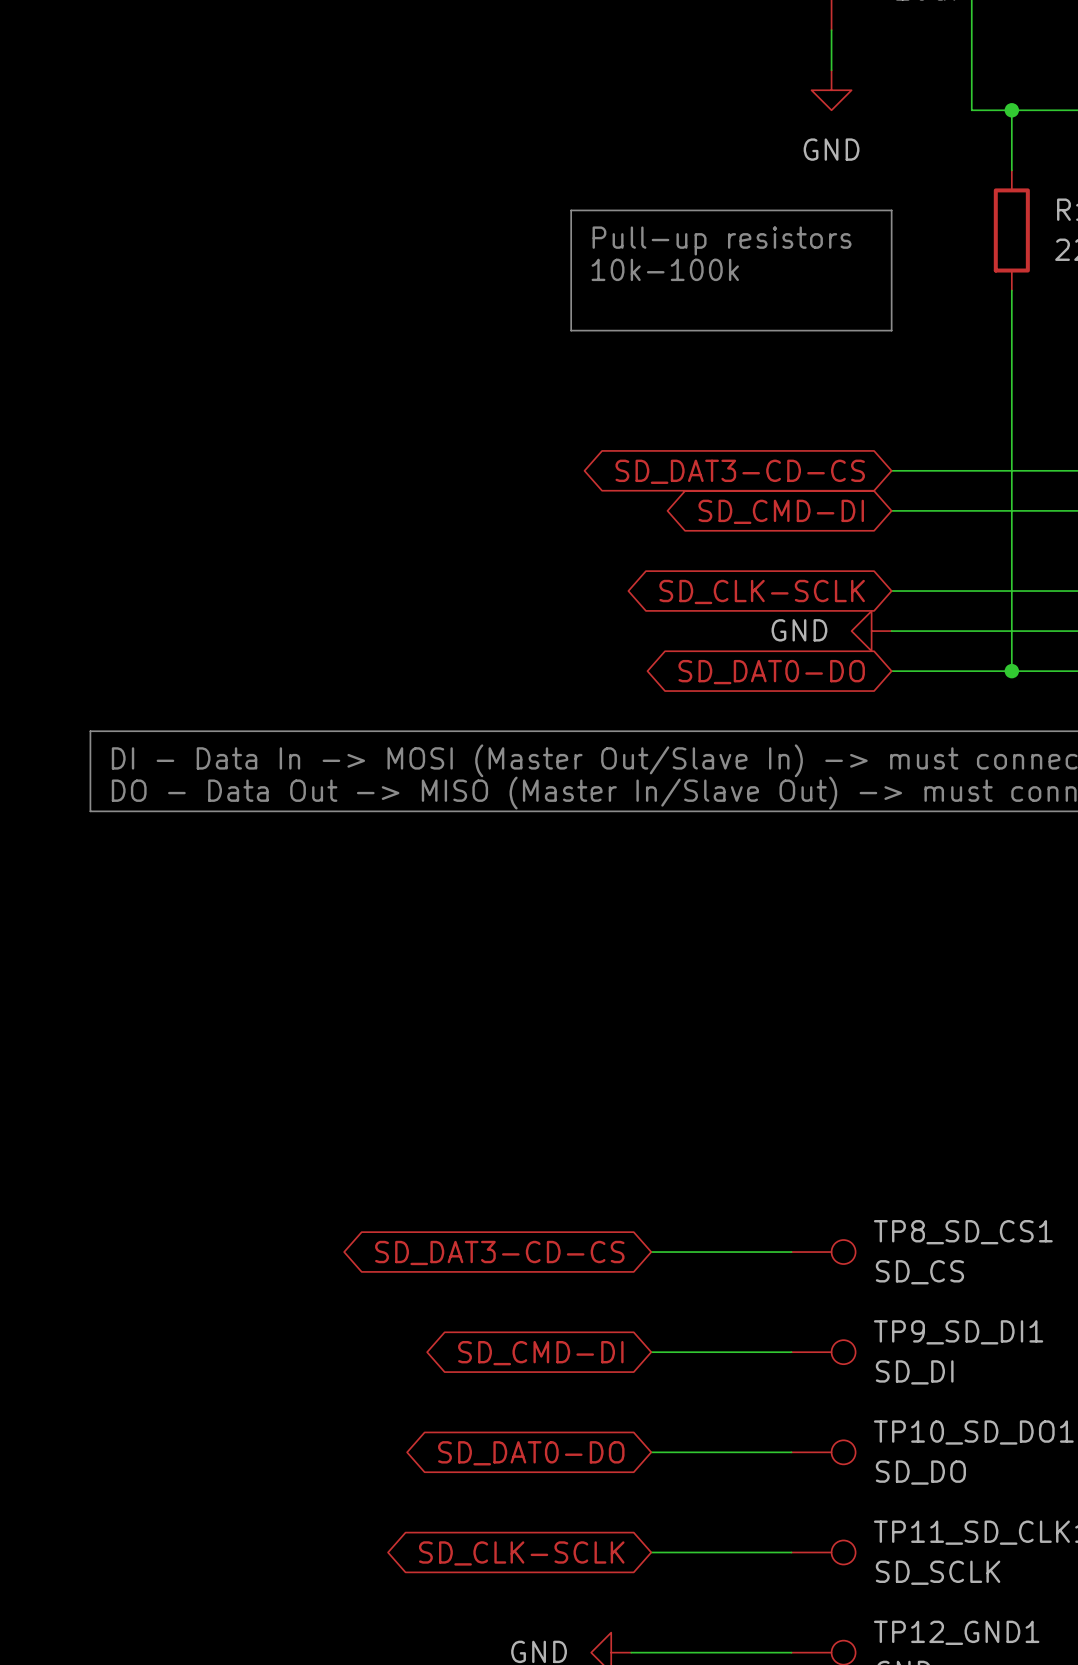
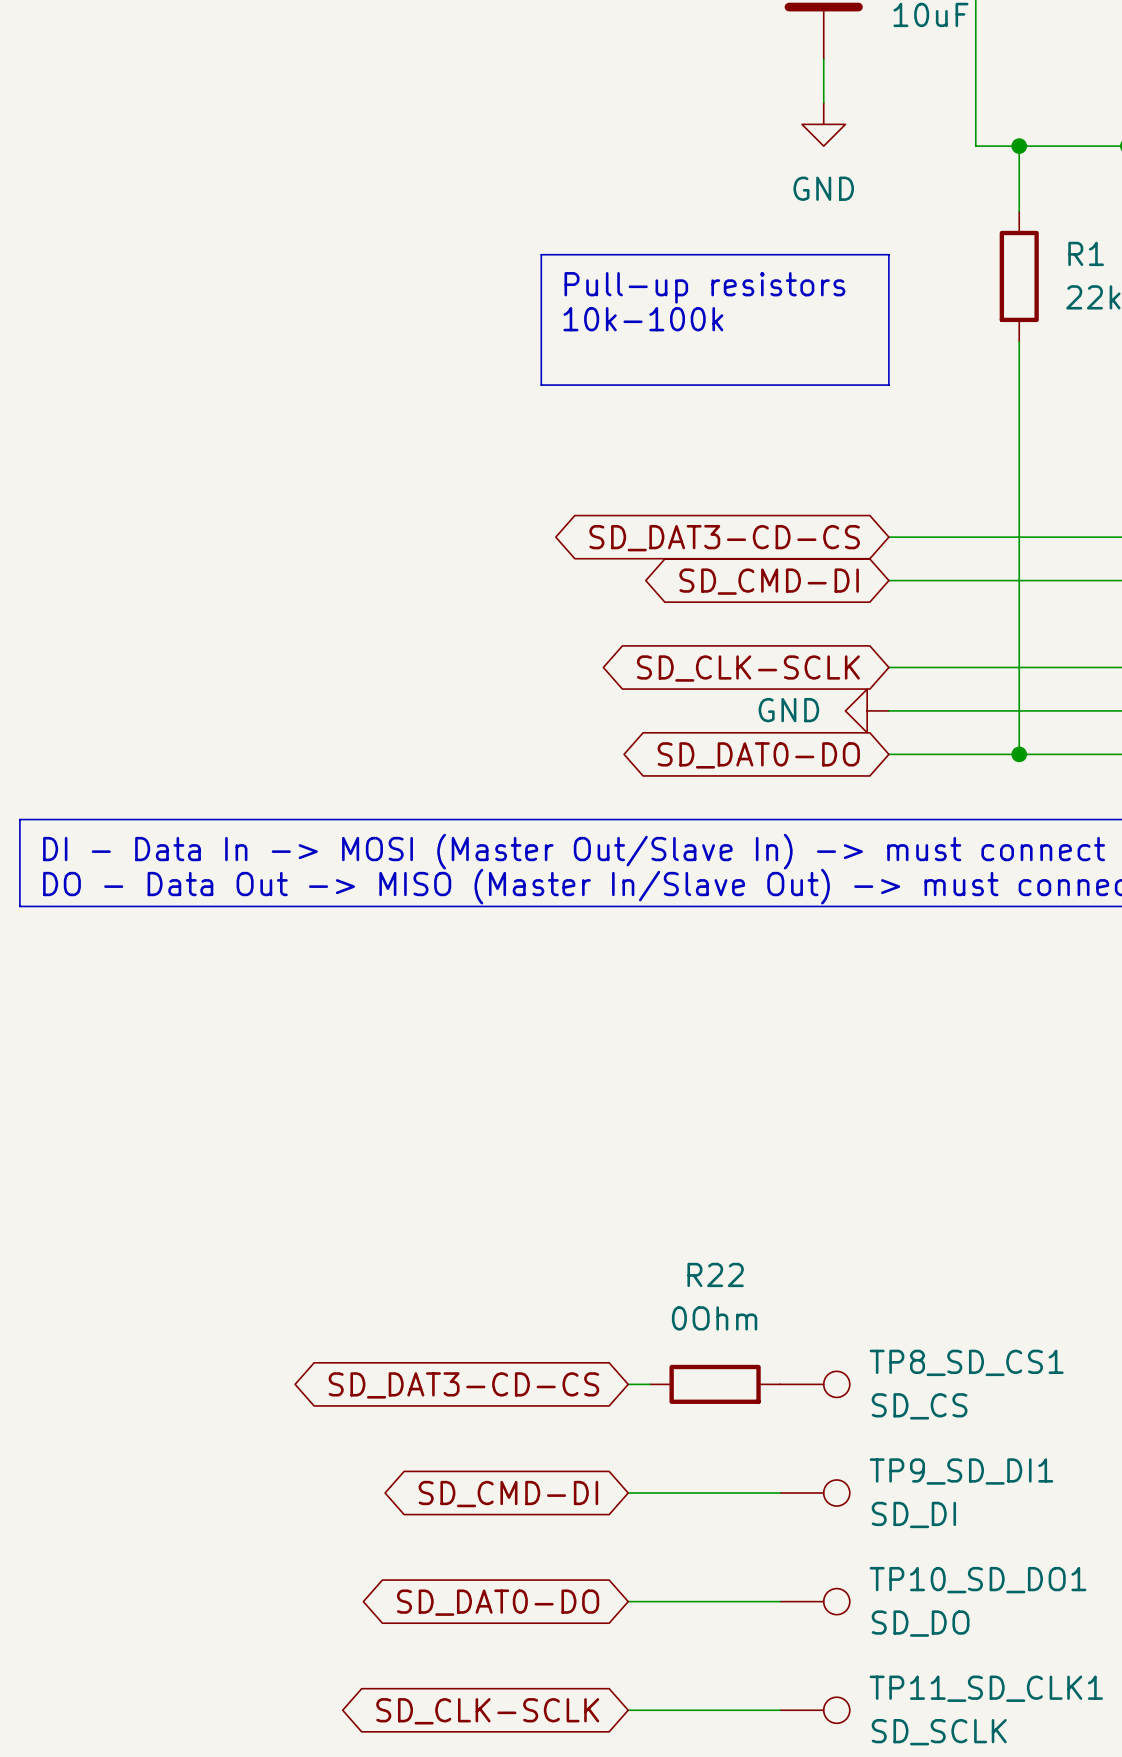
wire: (671, 1252) (791, 1252) -> none
R22: none -> 0Ohm (715, 1384)

